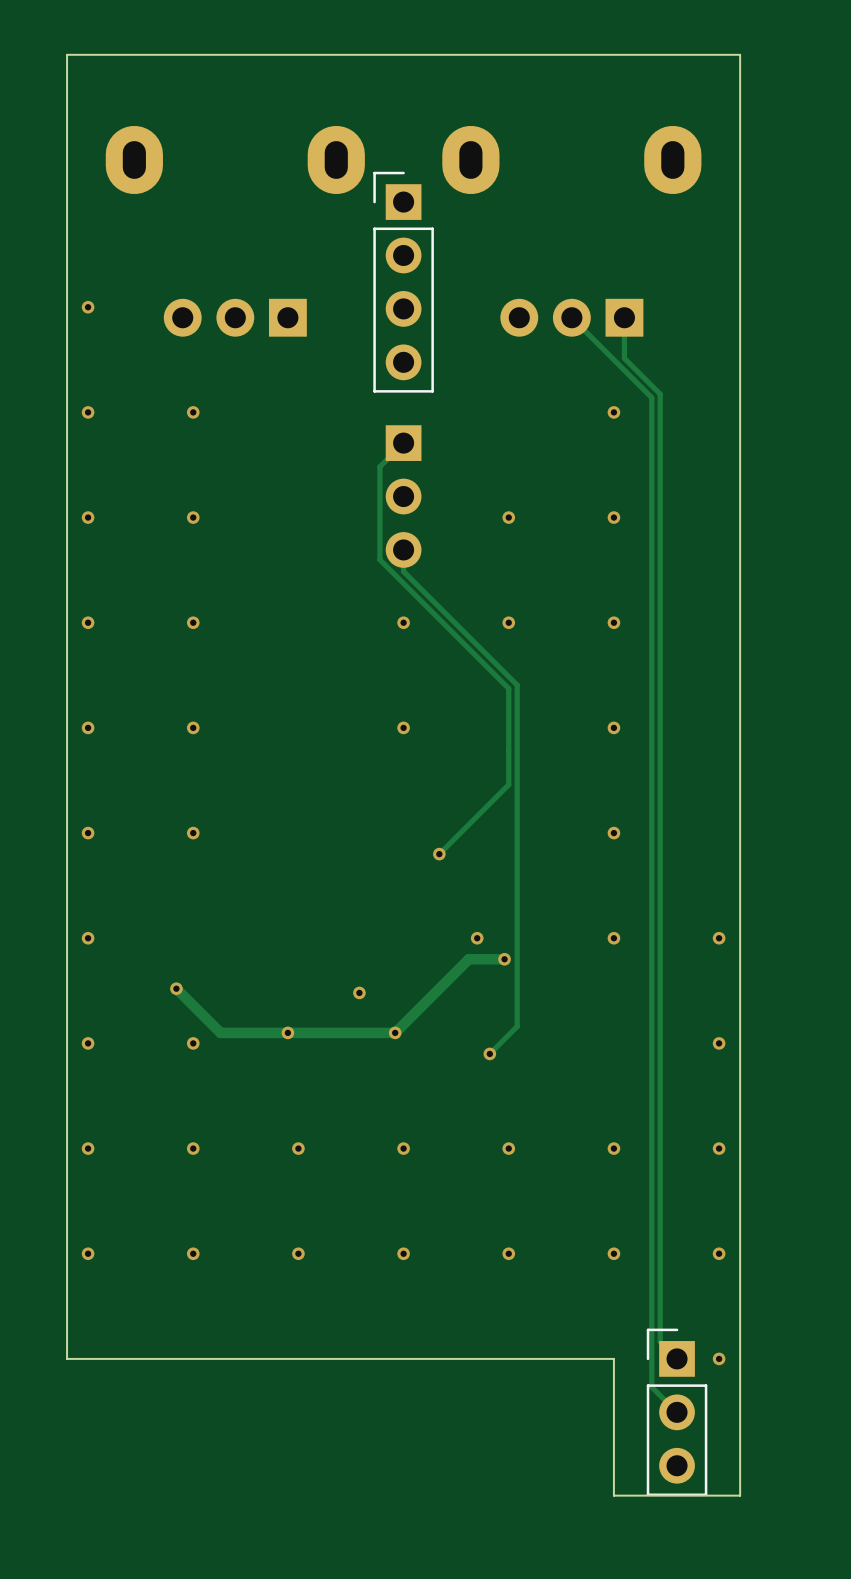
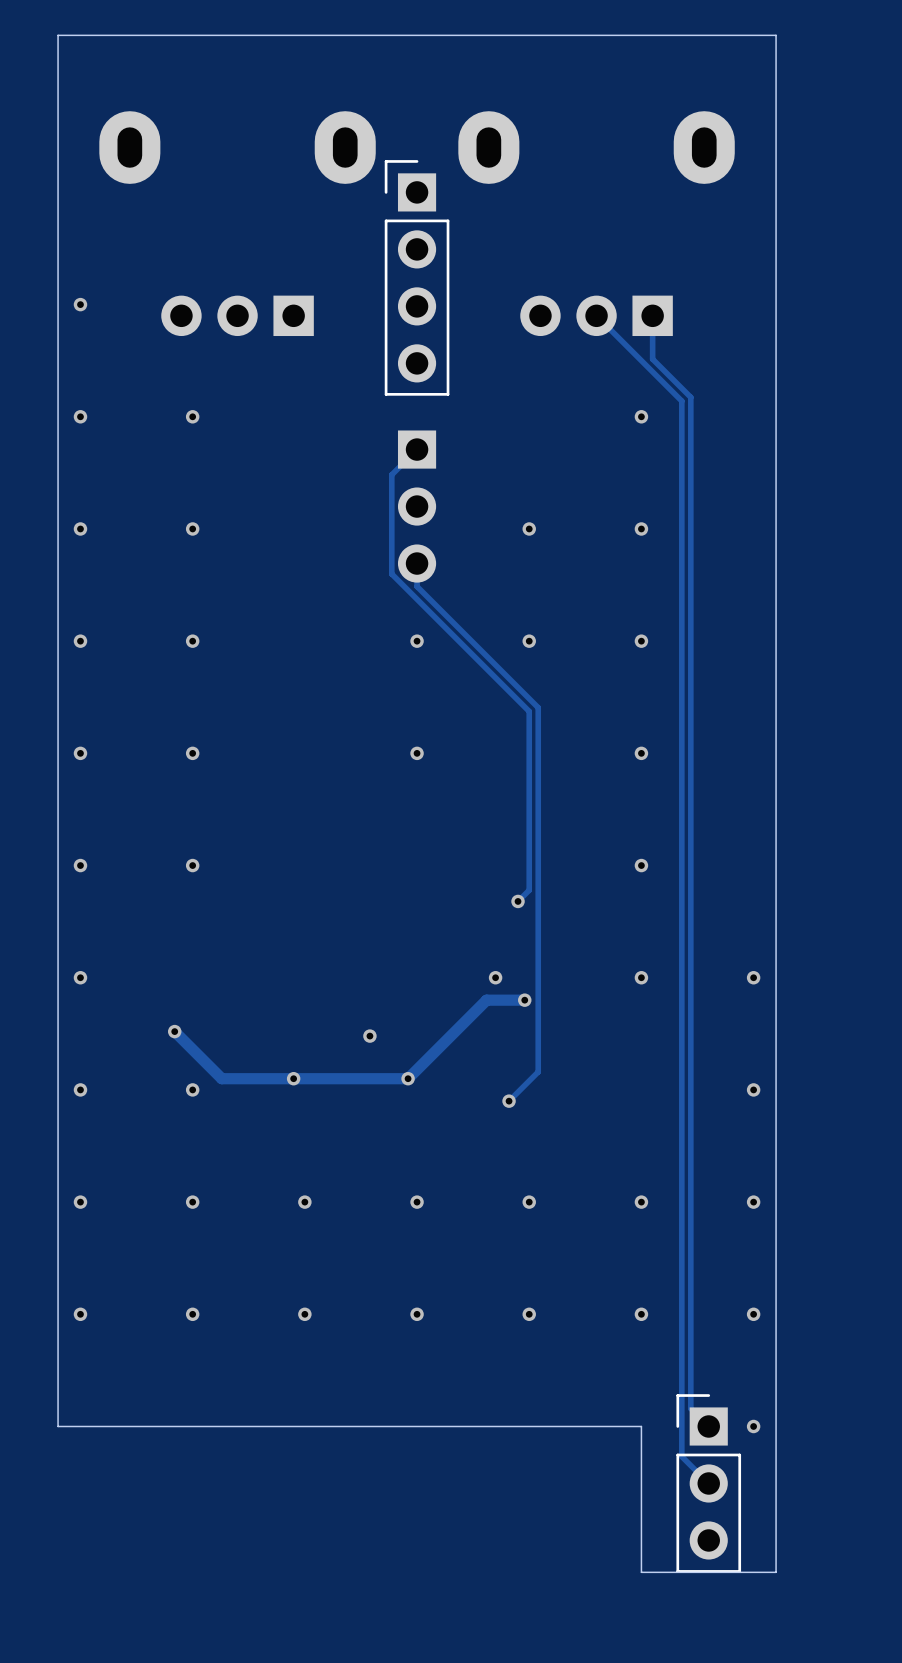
track: (508, 784) (439, 854) -> (529, 813) (529, 890) (518, 901)
via position: (439, 854) -> (518, 901)

